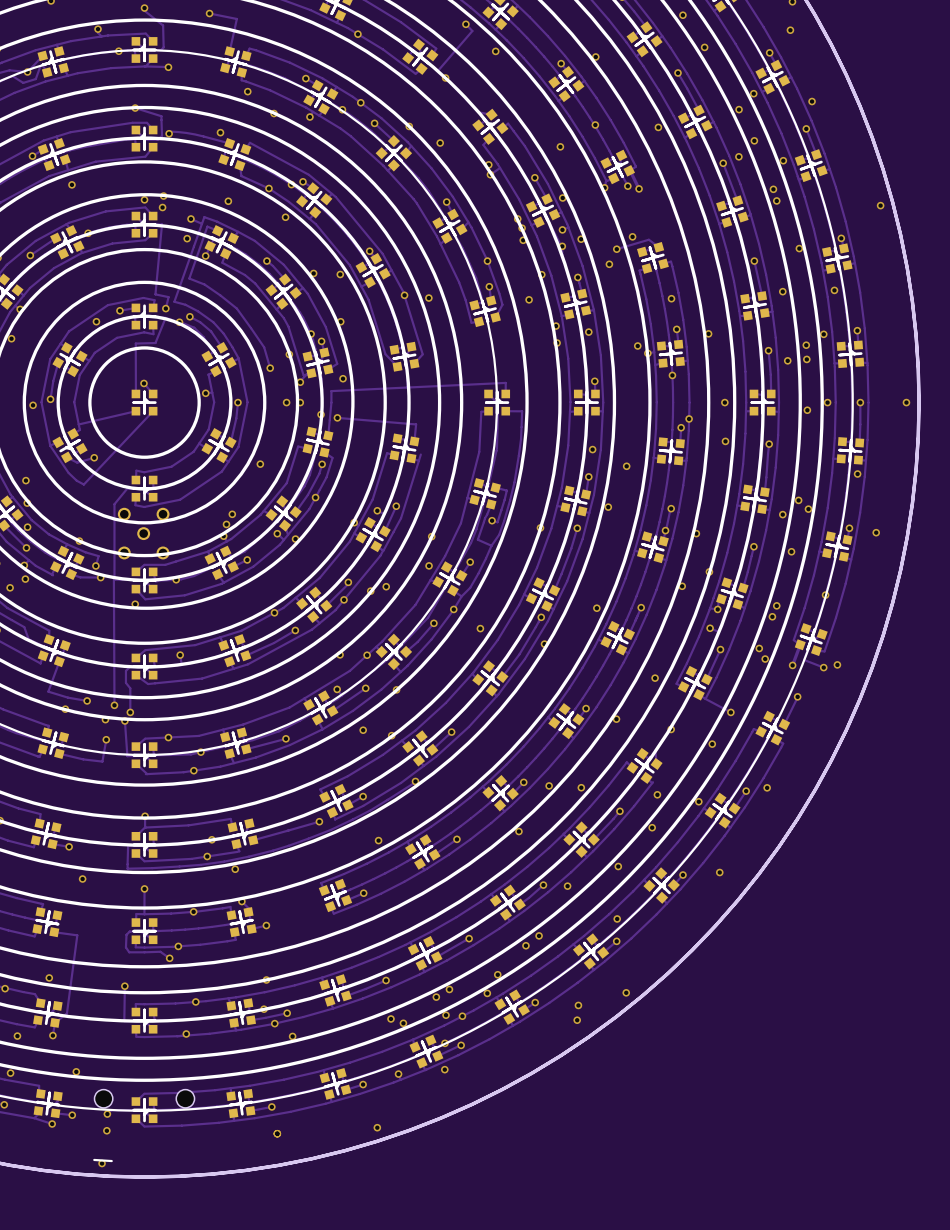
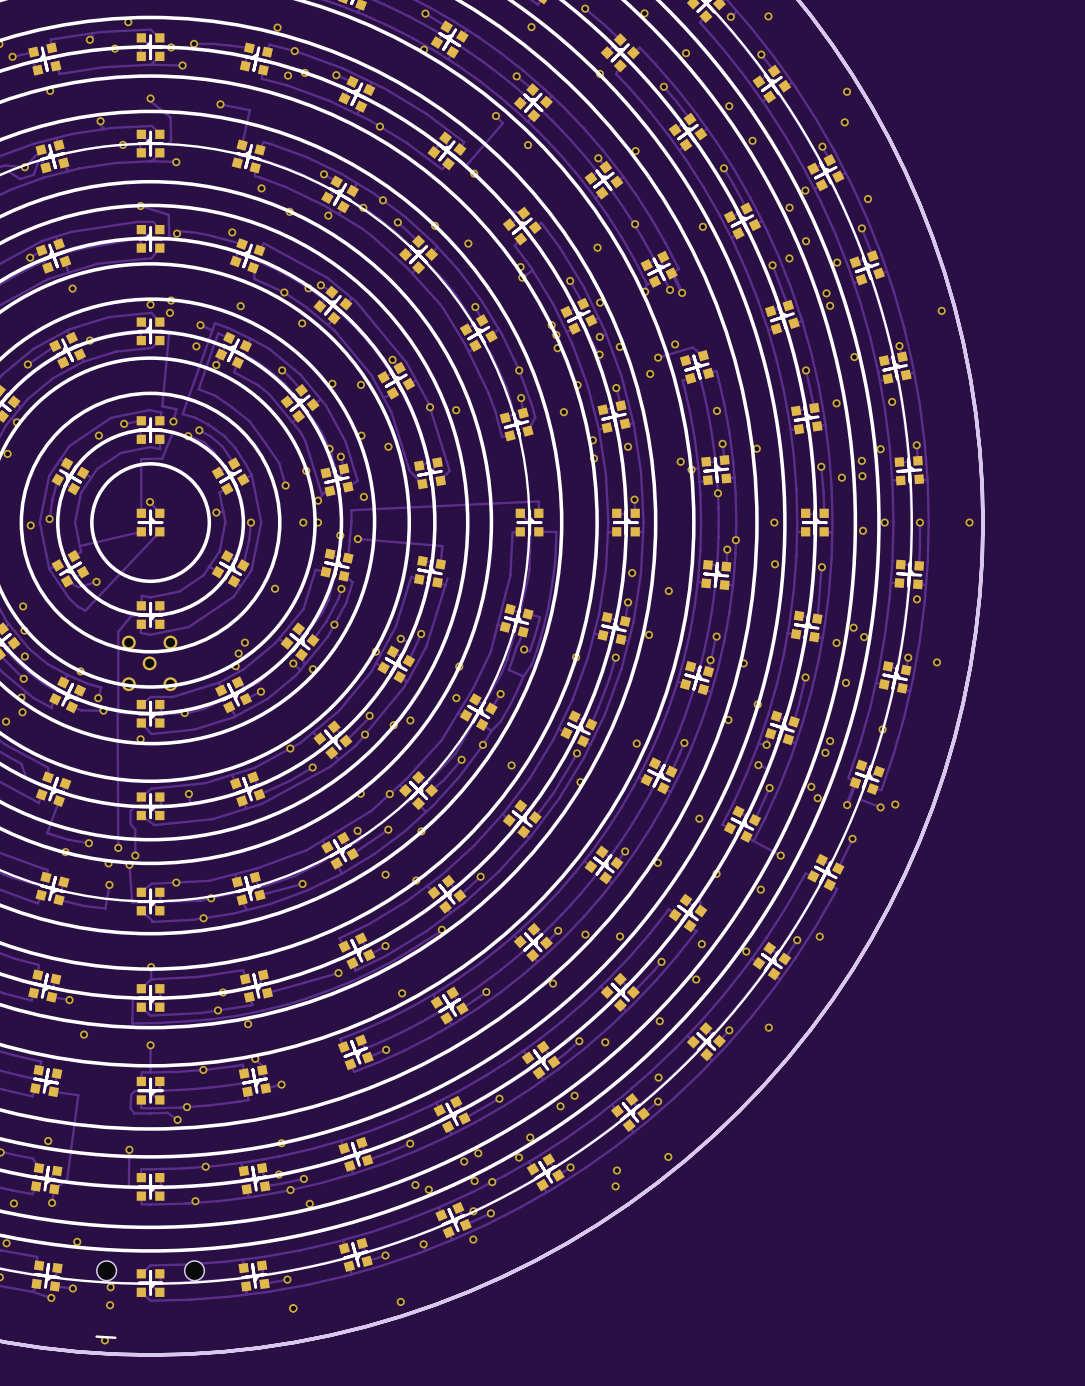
via: none -> (388, 446)

